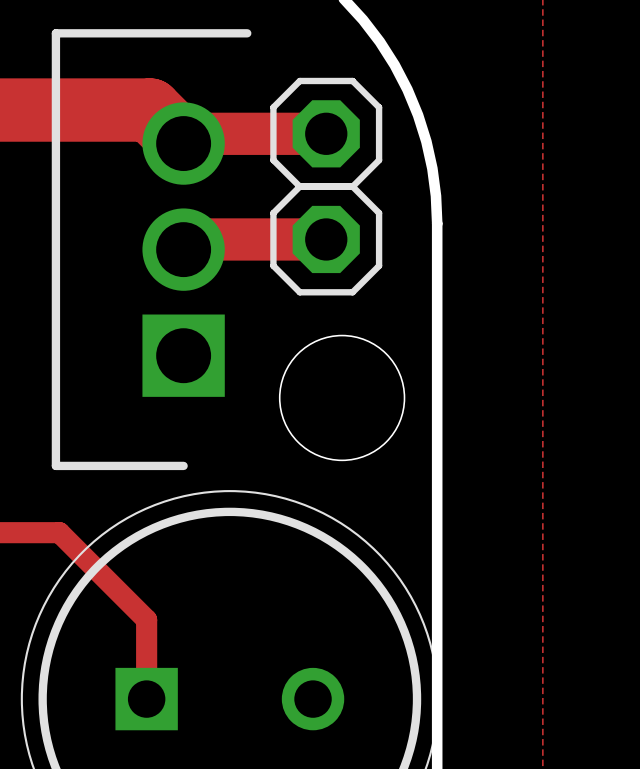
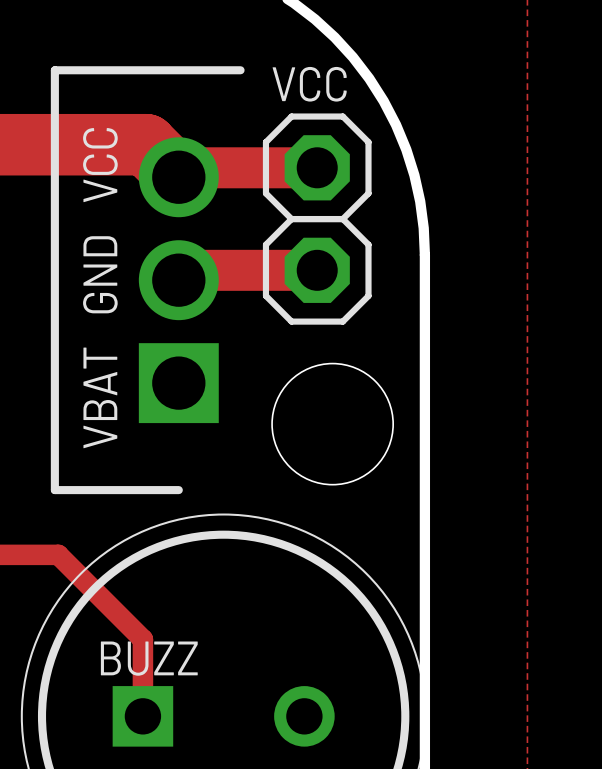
text: none -> VCC (309, 84)
text: none -> VCC (100, 165)
text: none -> GND (100, 274)
text: none -> VBAT (100, 397)
text: none -> BUZZ (149, 658)

